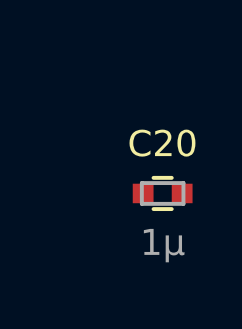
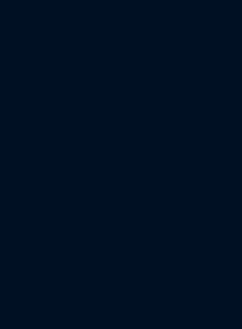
C20: 1µ (162, 193) -> none

